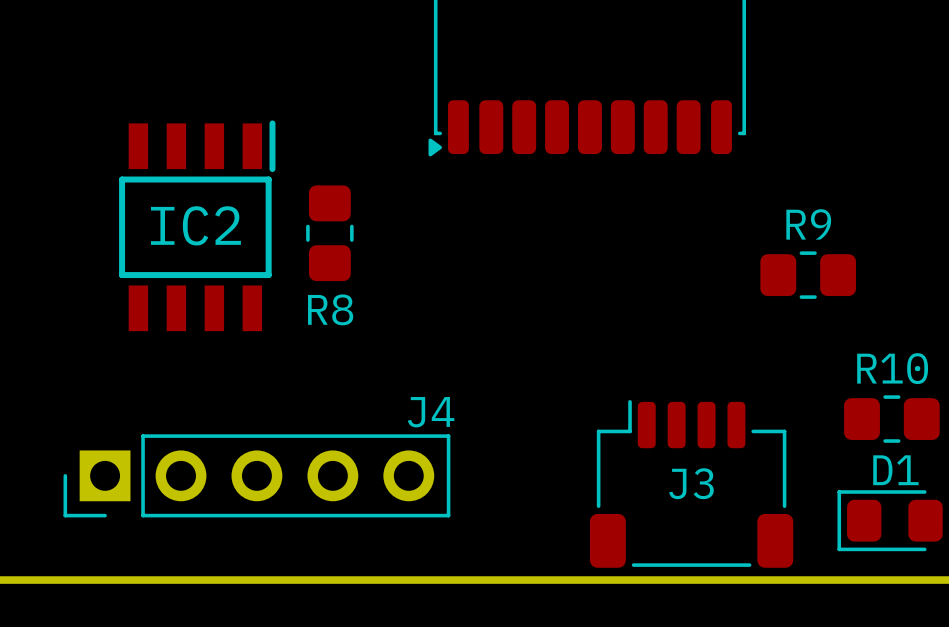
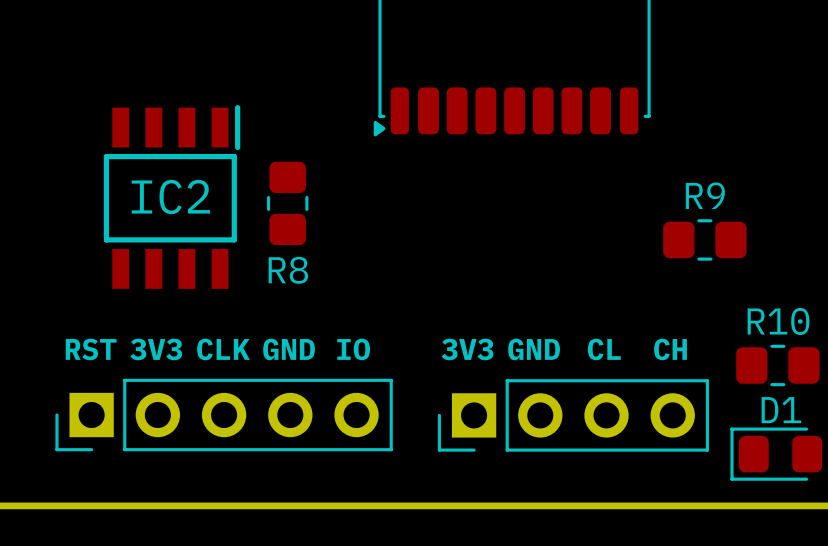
text: none -> RST (91, 349)
text: none -> 3V3 (156, 349)
text: none -> CLK (223, 349)
text: none -> GND (289, 349)
text: none -> IO (353, 349)
text: none -> 3V3 (467, 349)
text: none -> GND (534, 349)
text: none -> CL (604, 349)
text: none -> CH (670, 349)
J4 name: J4 (431, 412) -> none
part: none -> (573, 415)
J3: (691, 483) -> none

